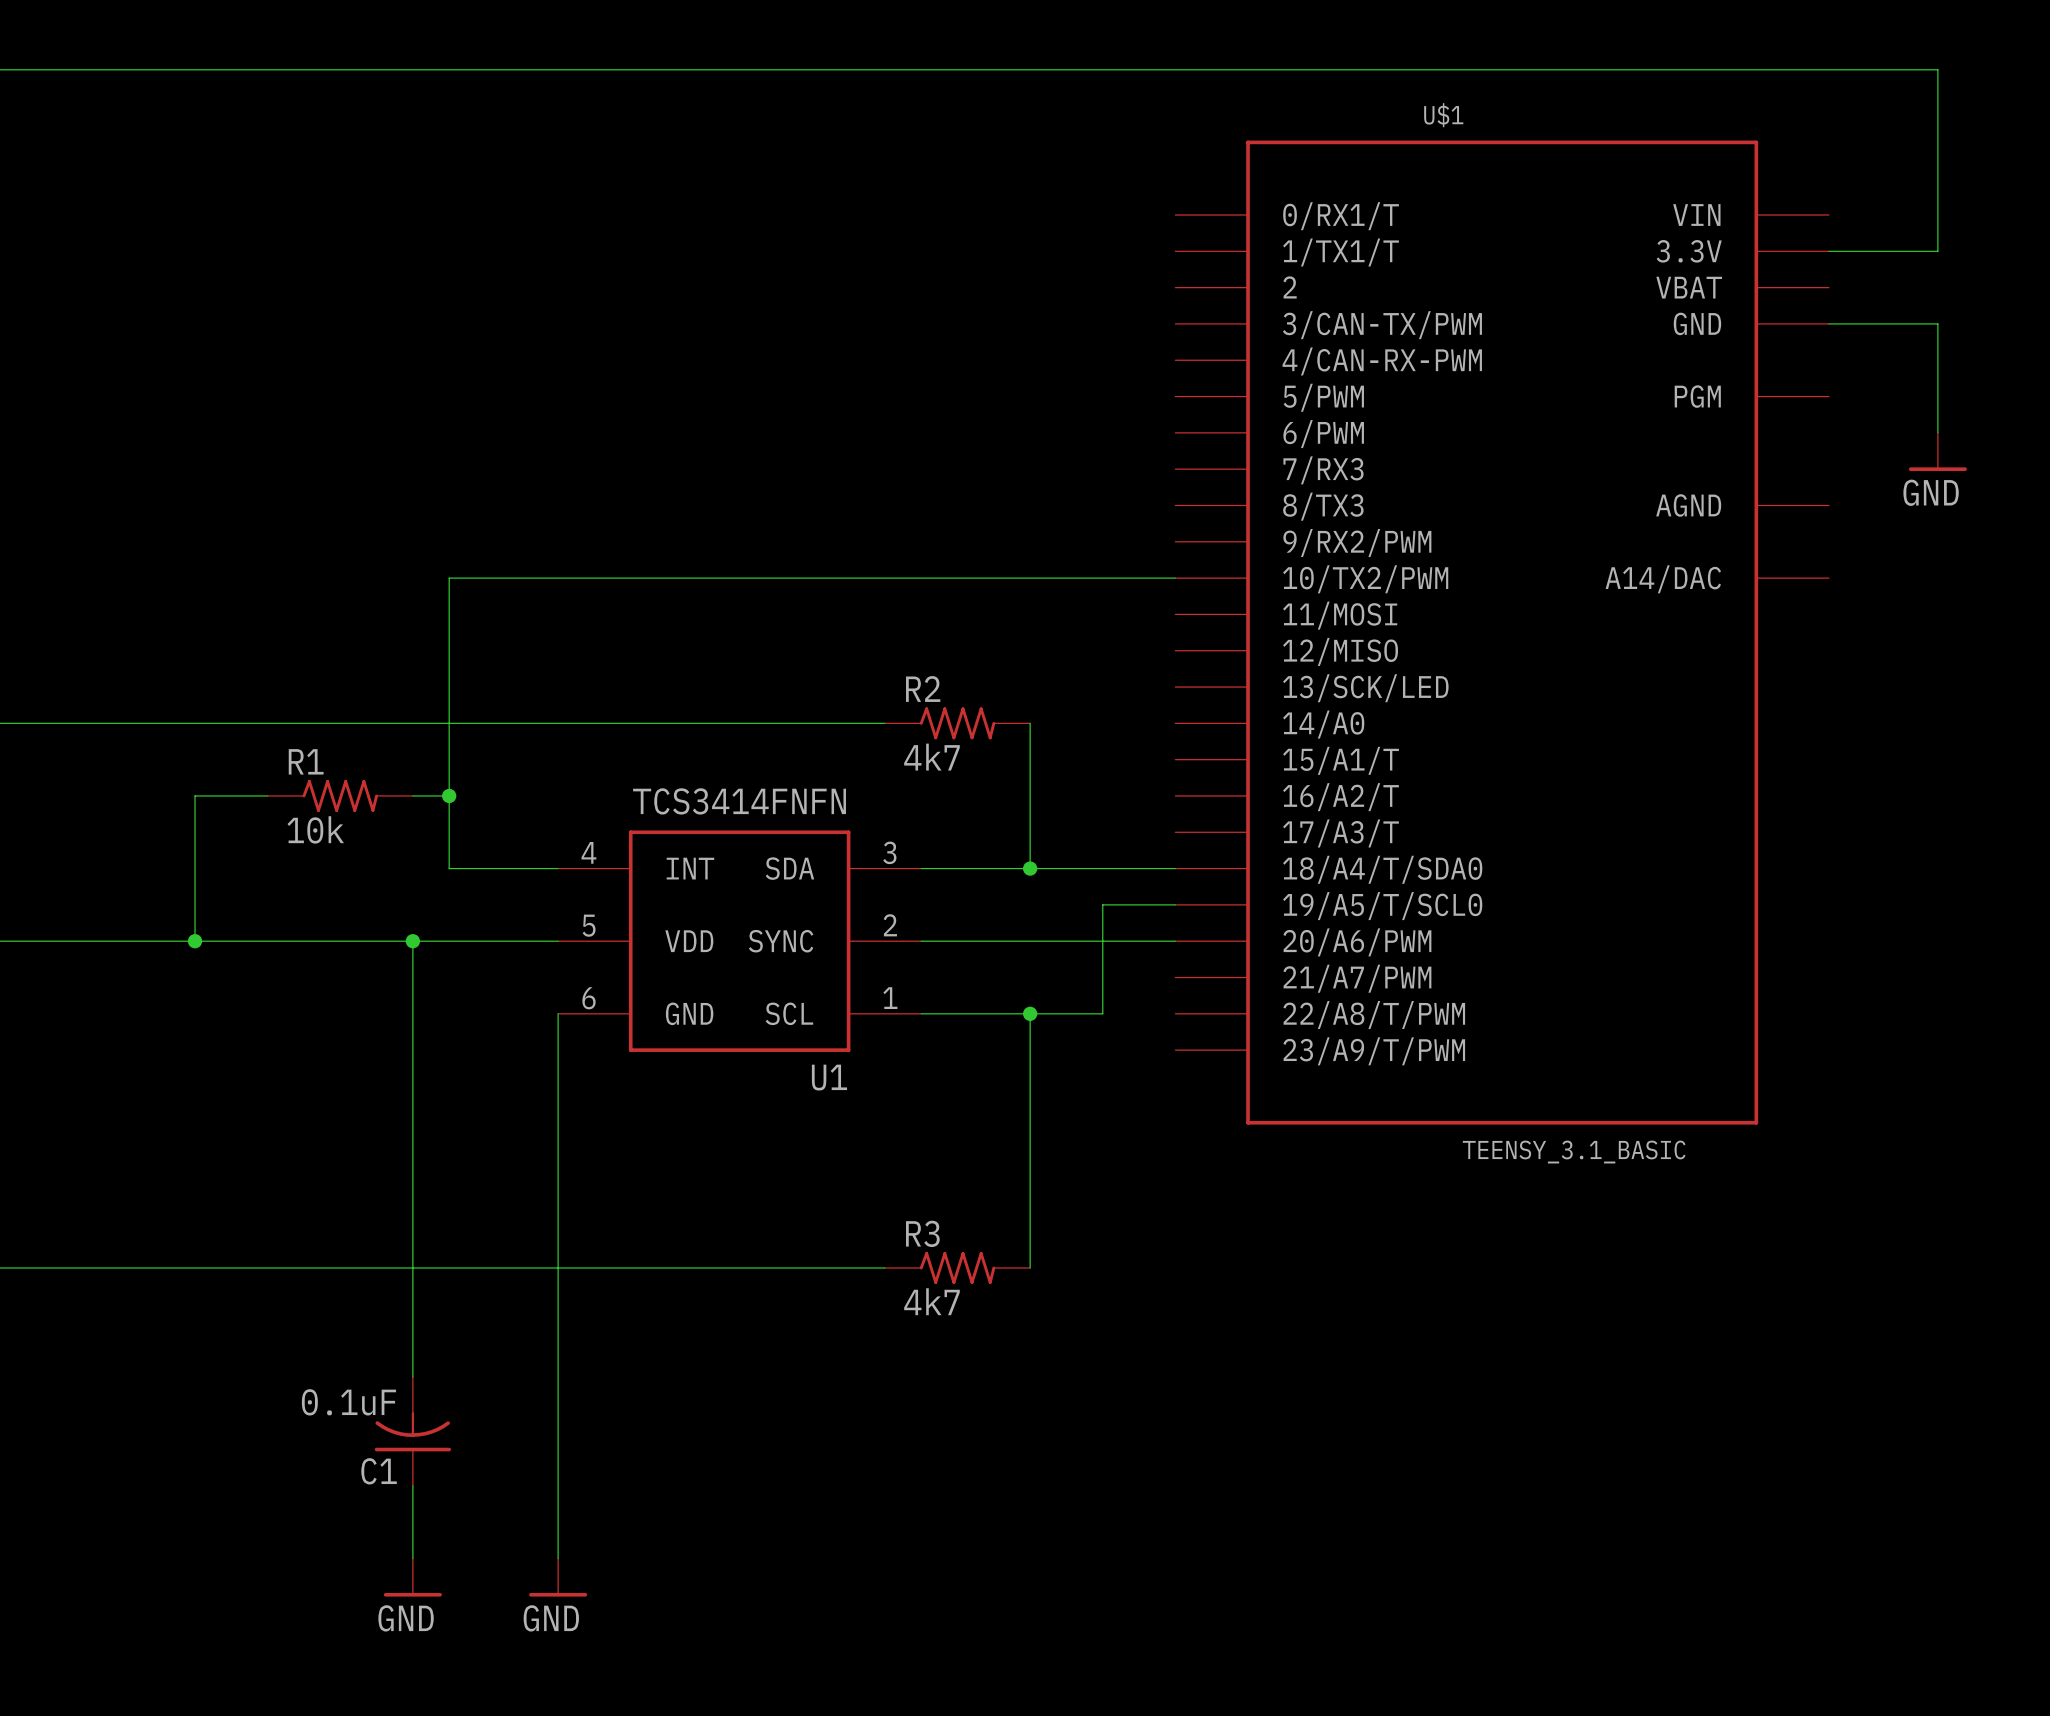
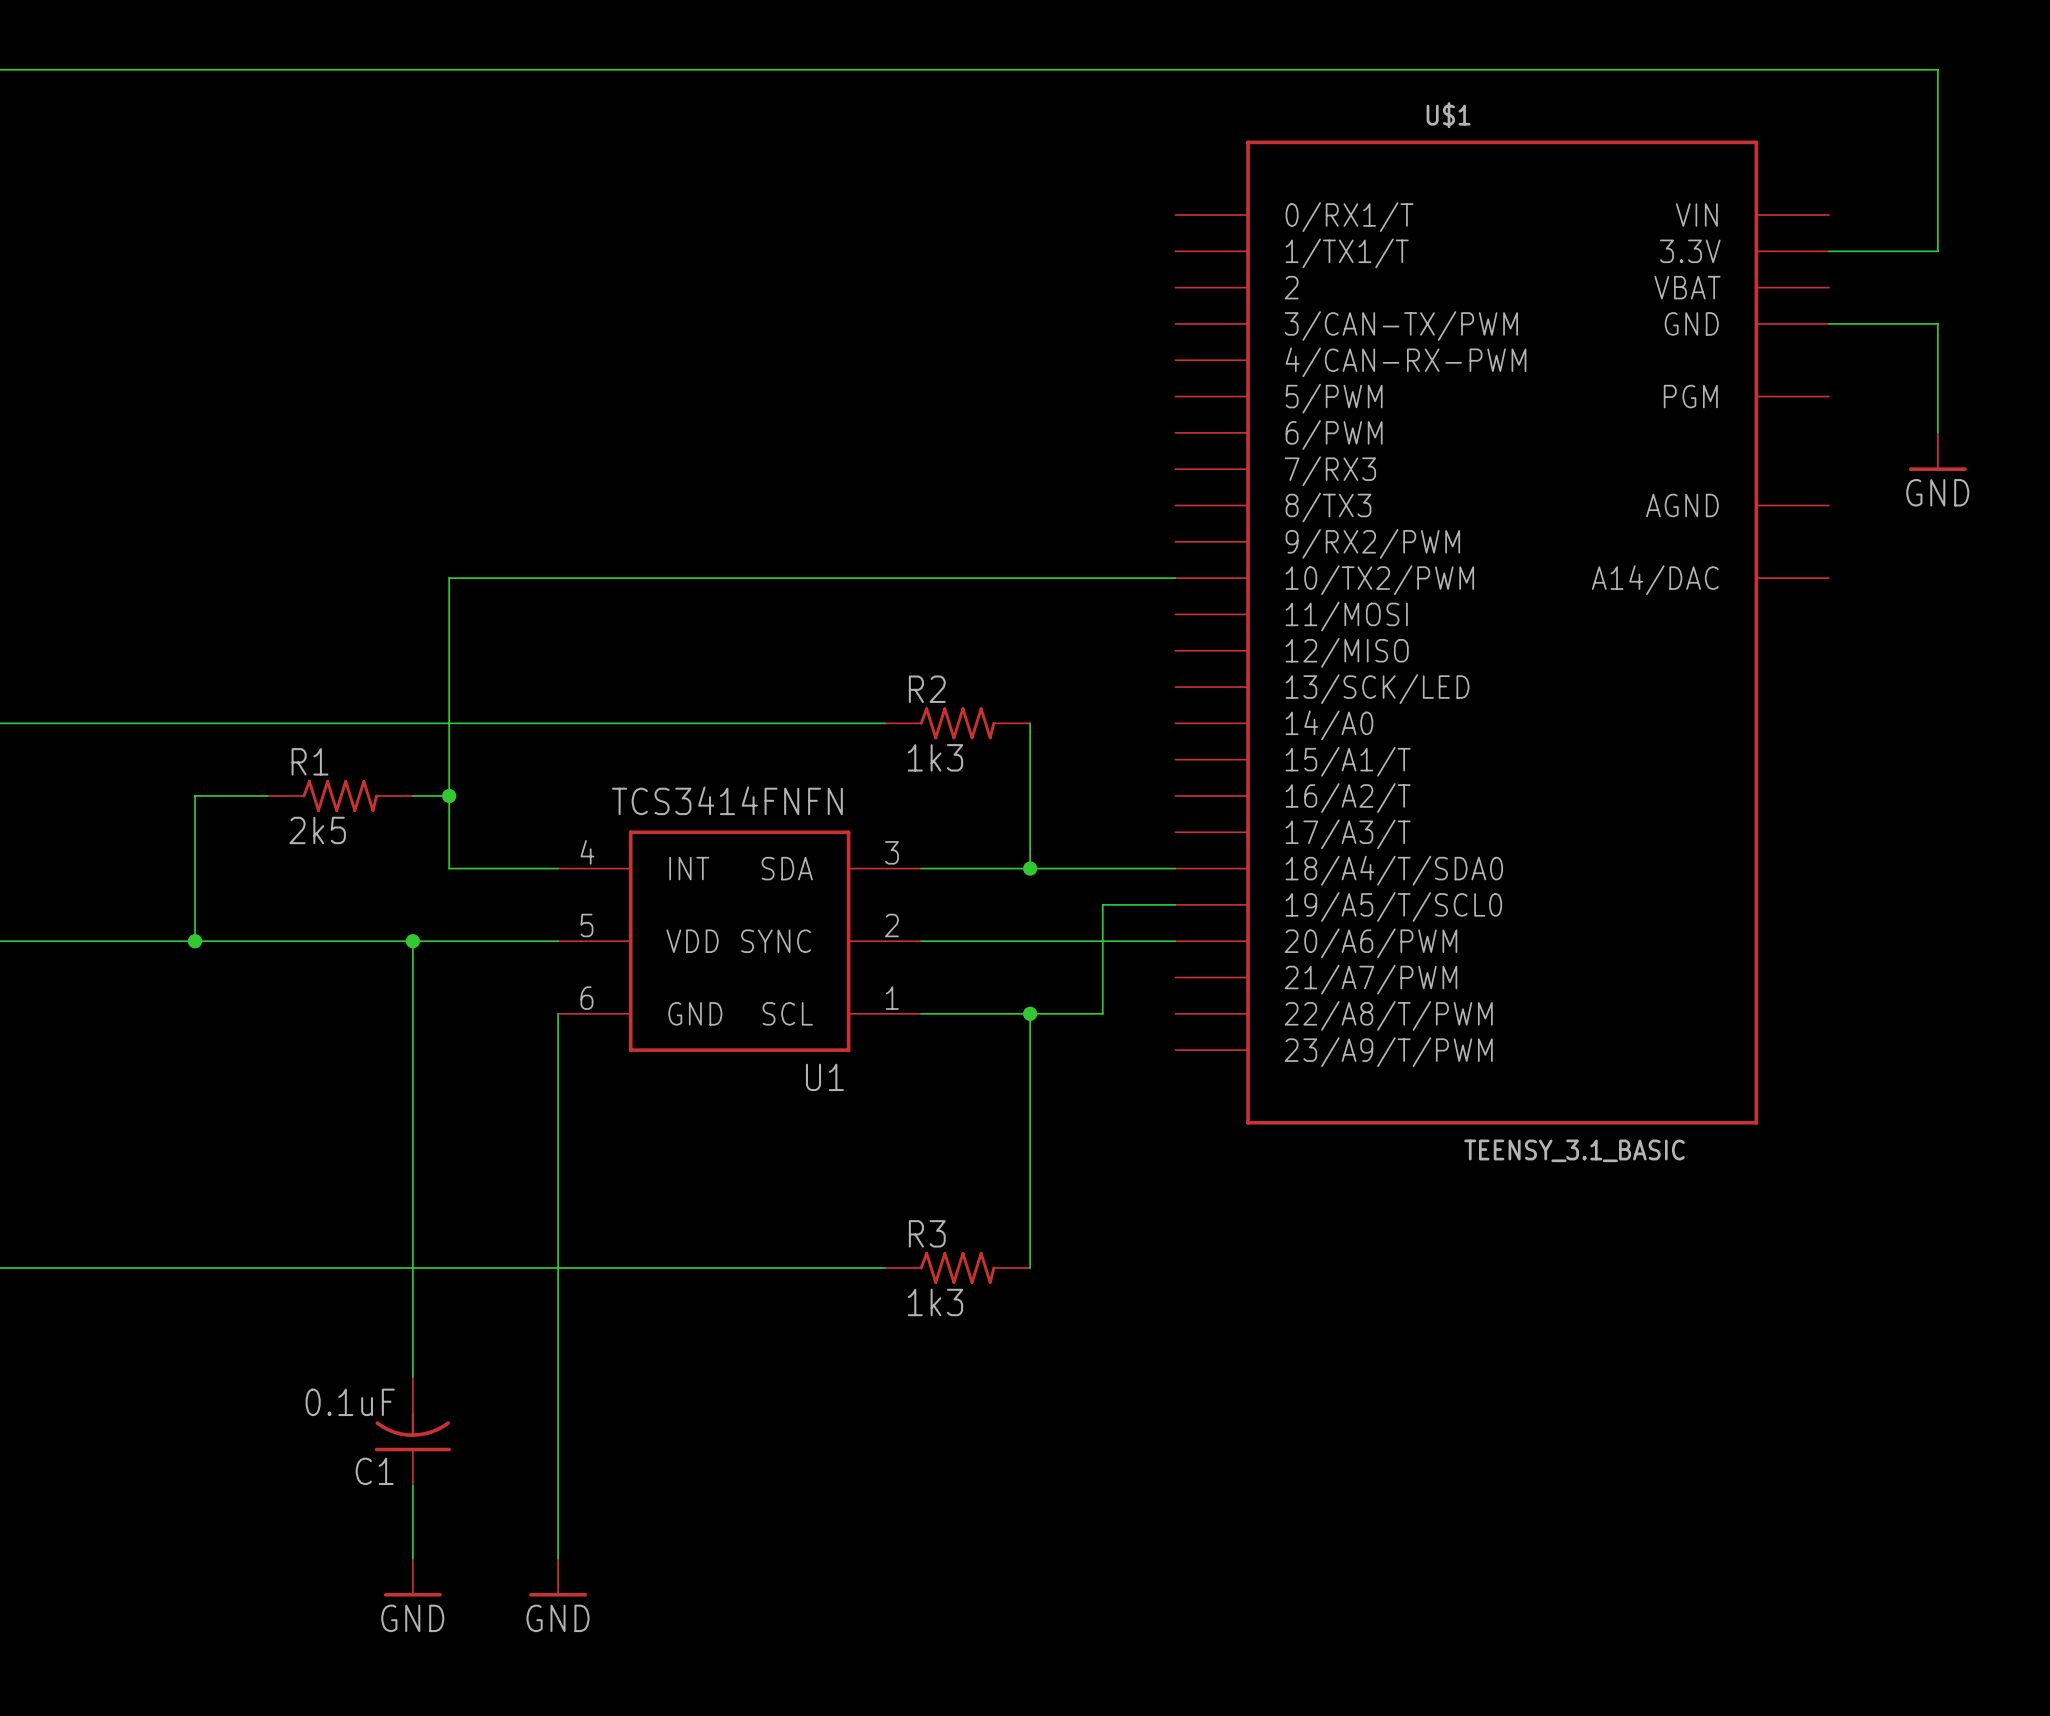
R2 value: 4k7 (931, 757) -> 1k3 (935, 757)
R1 value: 10k (315, 829) -> 2k5 (317, 830)
R3 value: 4k7 (931, 1301) -> 1k3 (935, 1302)

